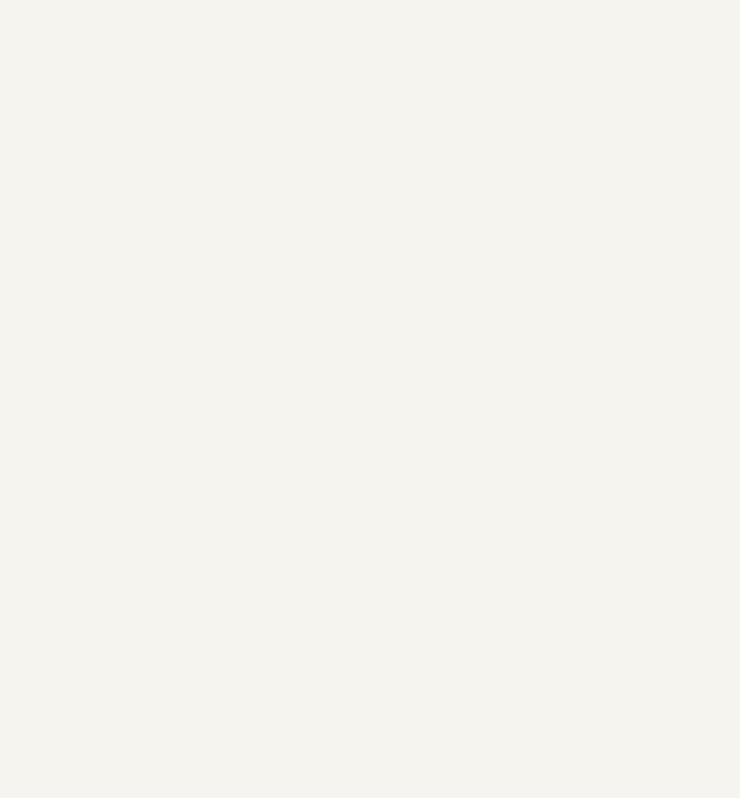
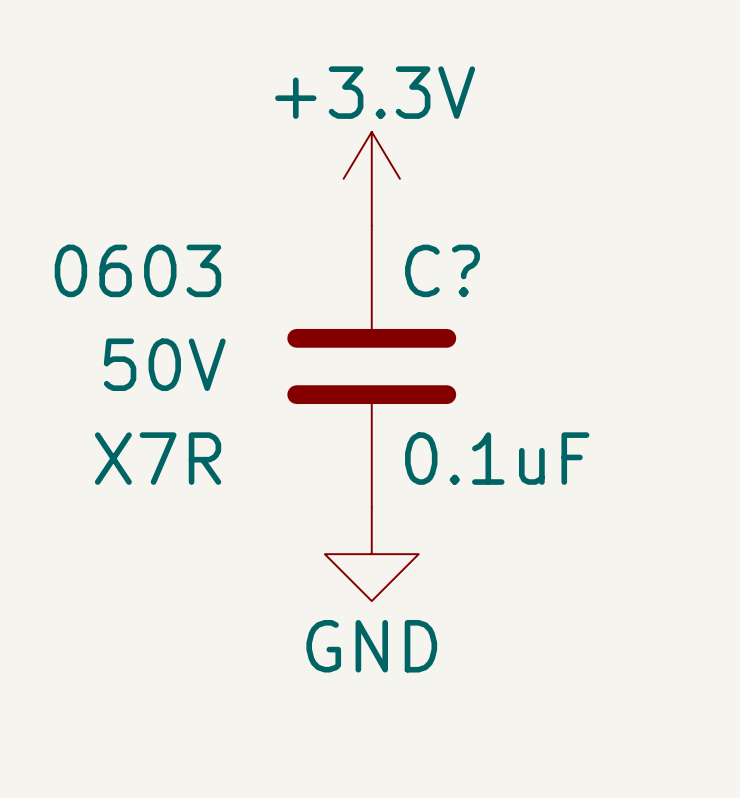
power symbol: none -> +3.3V (371, 178)
C?: none -> 0.1uF (371, 366)
power symbol: none -> GND (371, 554)

